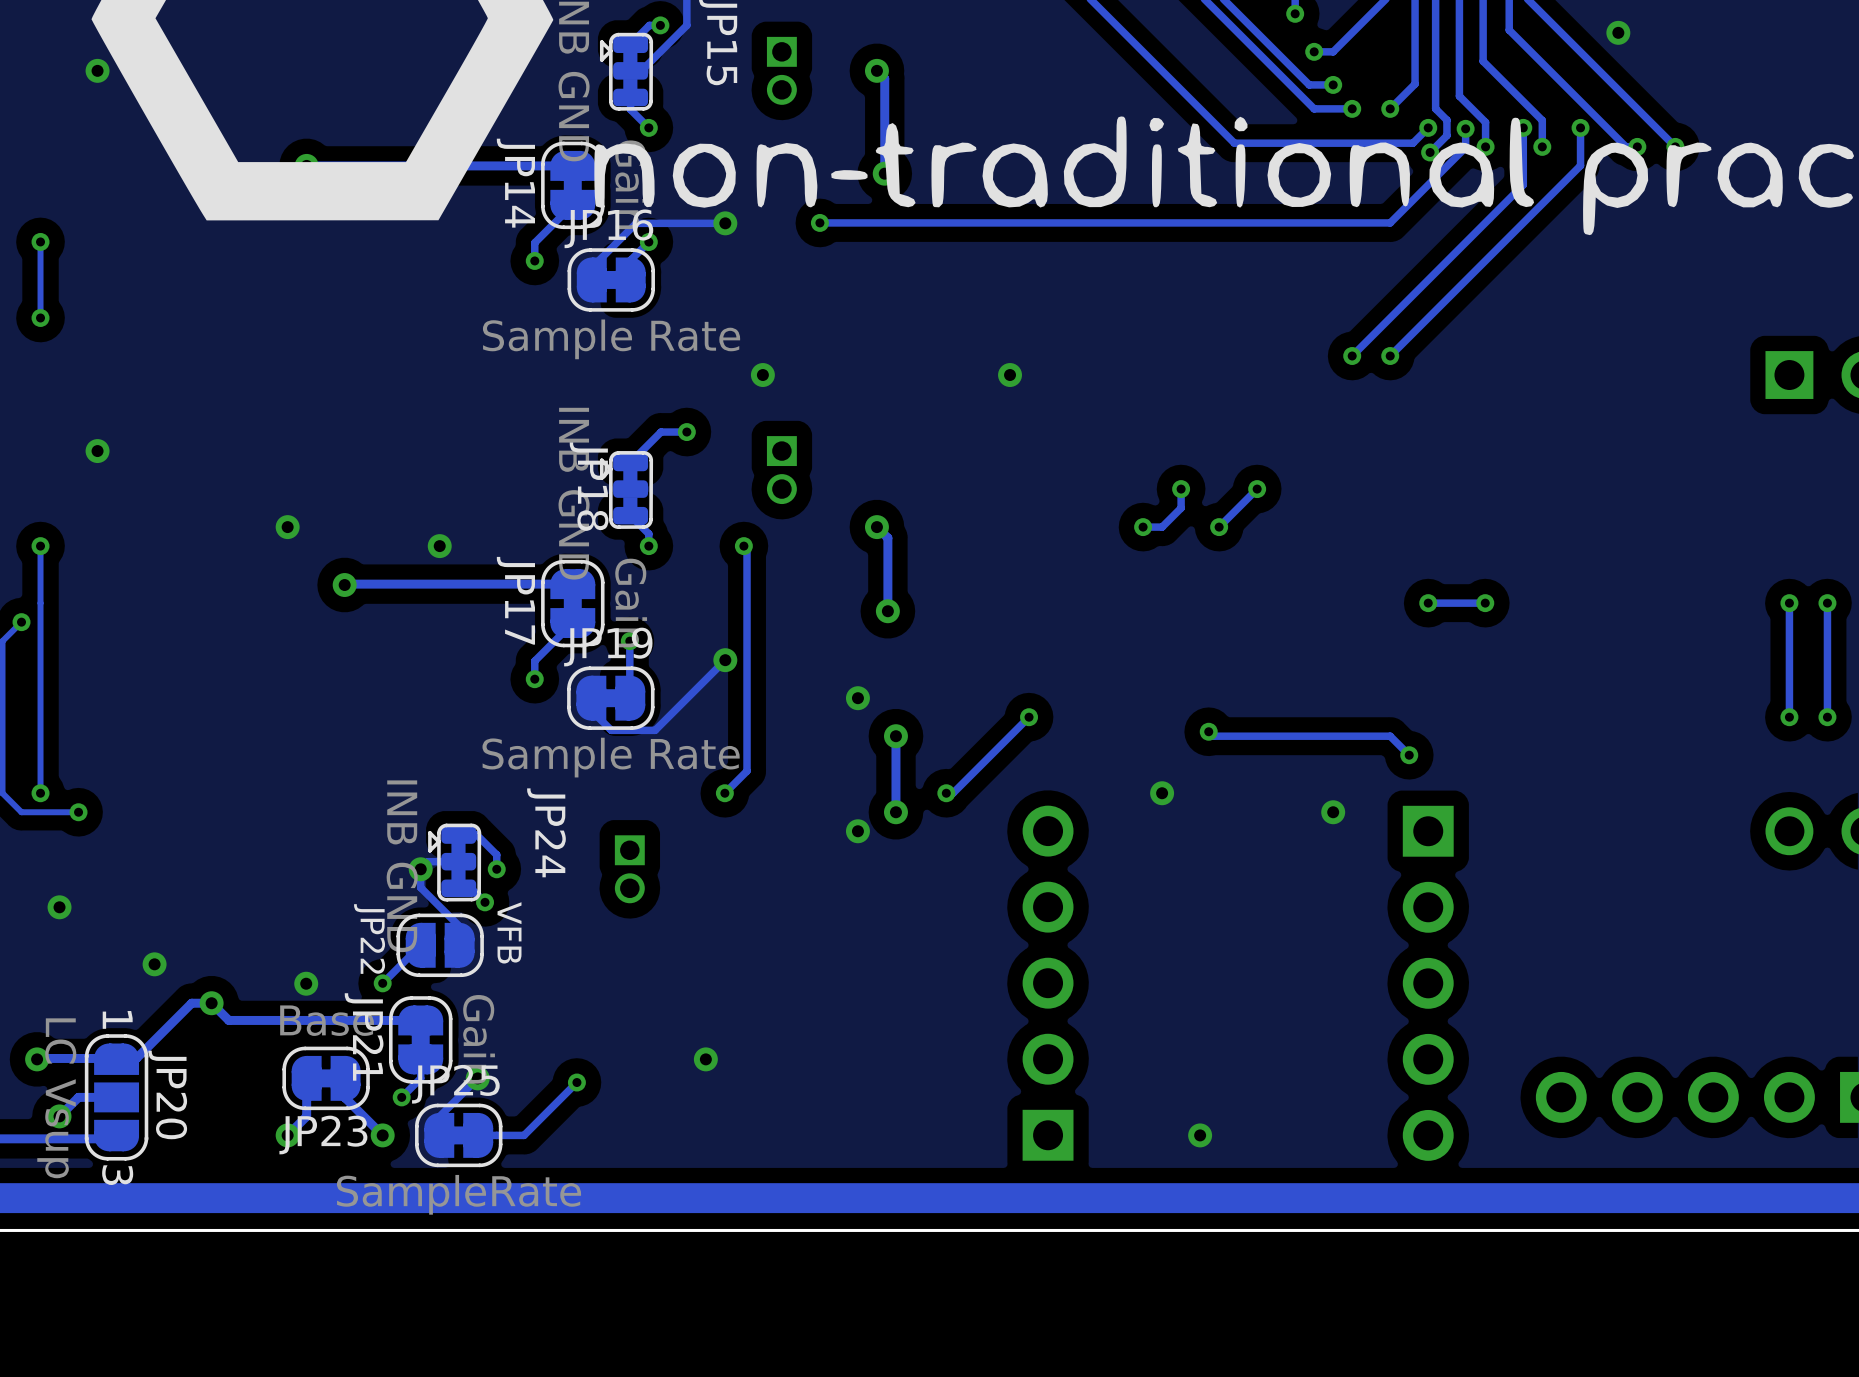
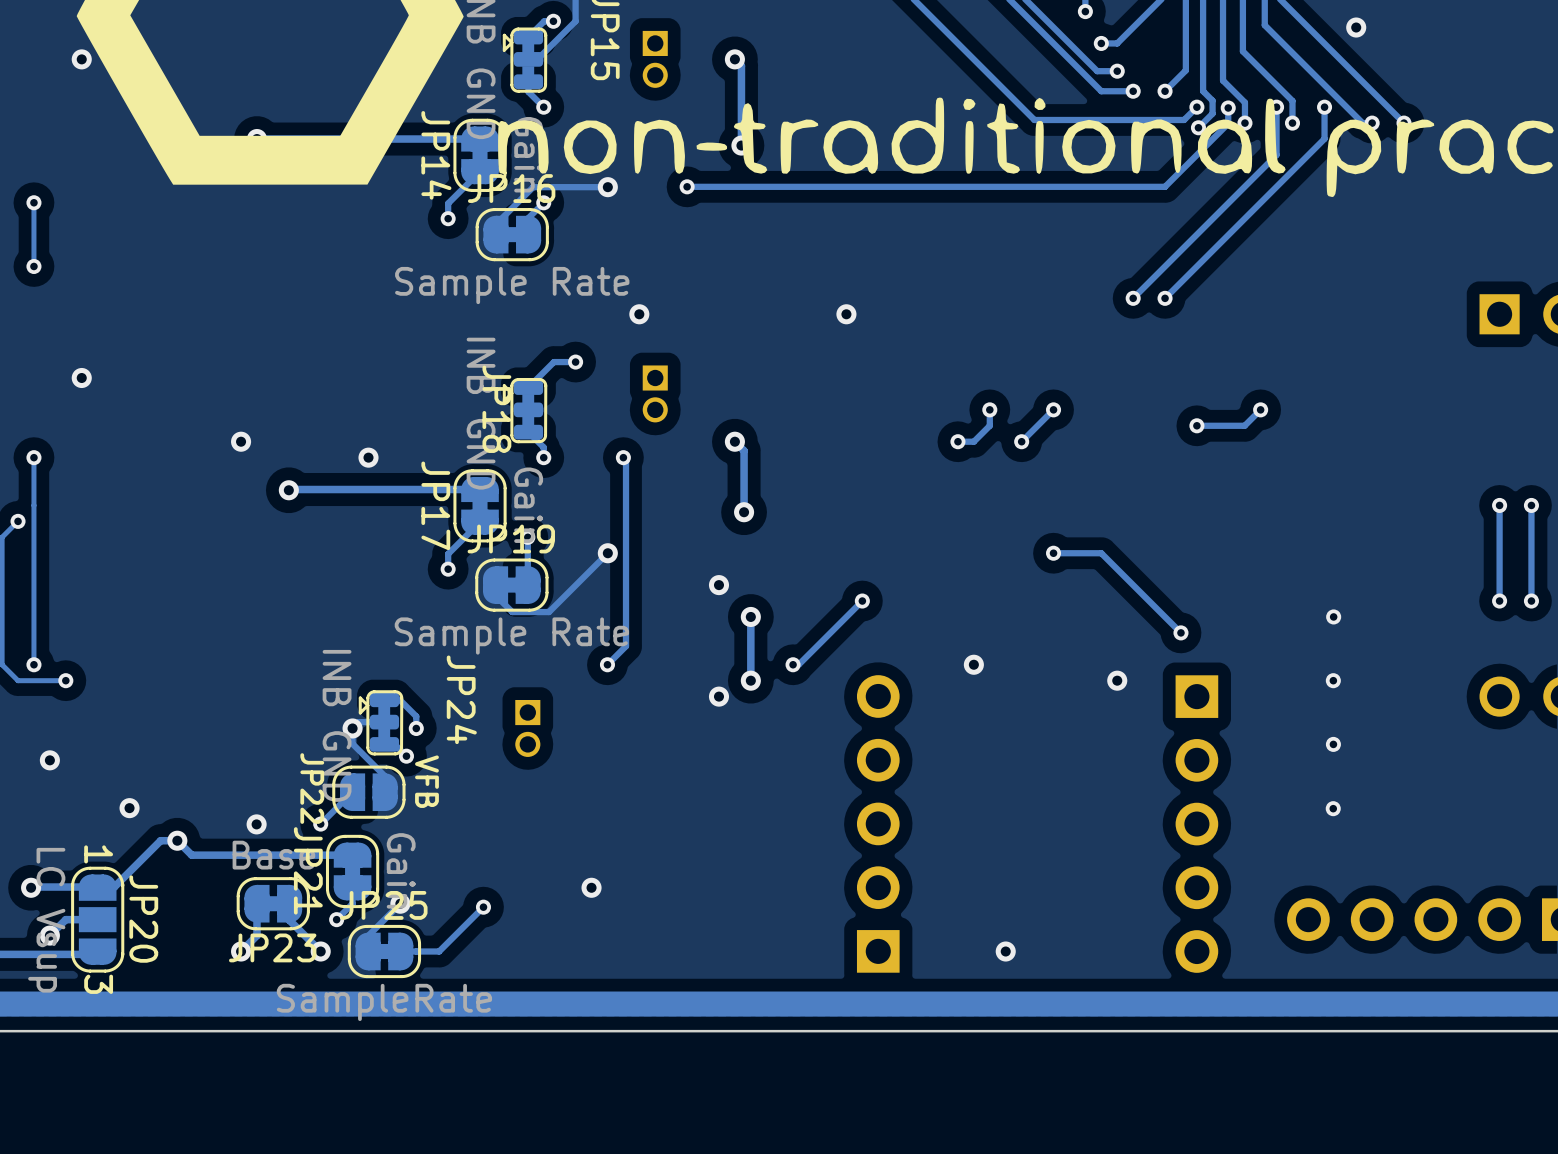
track: none -> (1260, 409) (1244, 425) (1196, 425)
via: none -> (1260, 409)
via: none -> (1196, 425)
via: (1428, 603) -> none
track: (1485, 603) (1428, 603) -> none
via: (1485, 603) -> none
track: (1208, 731) (1213, 736) (1390, 736) -> (1053, 553) (1101, 553) (1165, 616)
via position: (1208, 731) -> (1053, 553)
via: none -> (1333, 616)
via: none -> (1333, 680)
via: none -> (1333, 744)
via: none -> (1333, 808)

